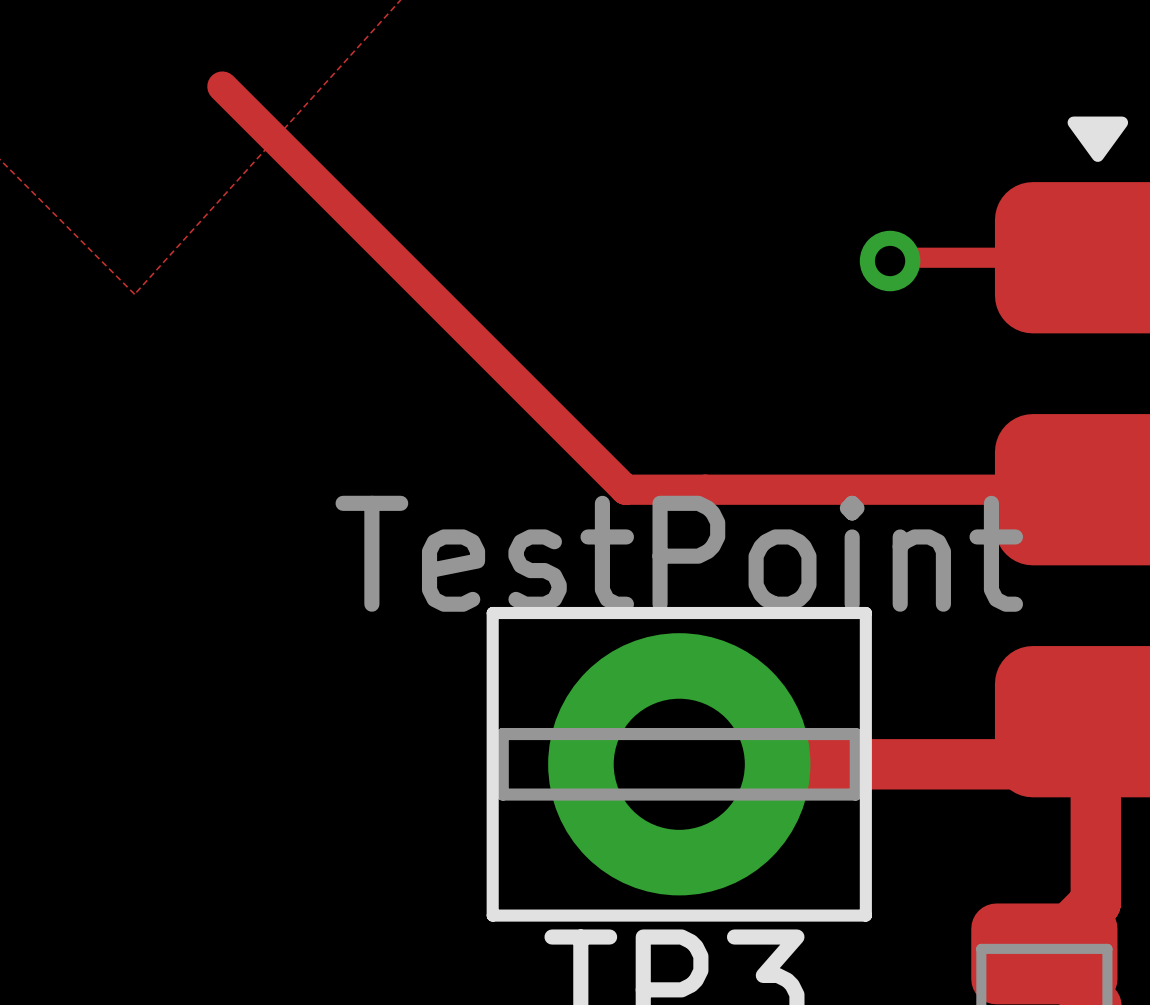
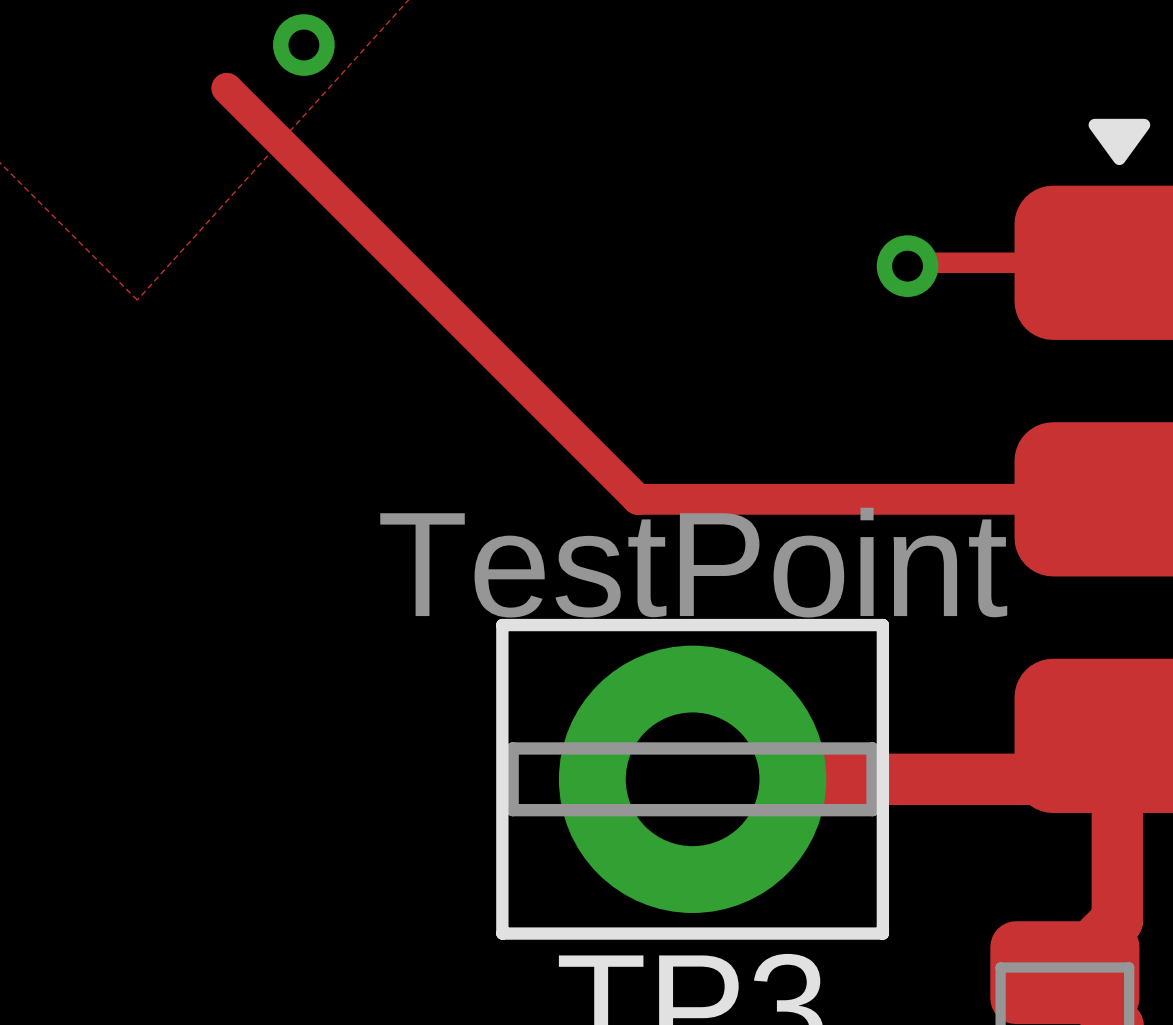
via: none -> (303, 45)

